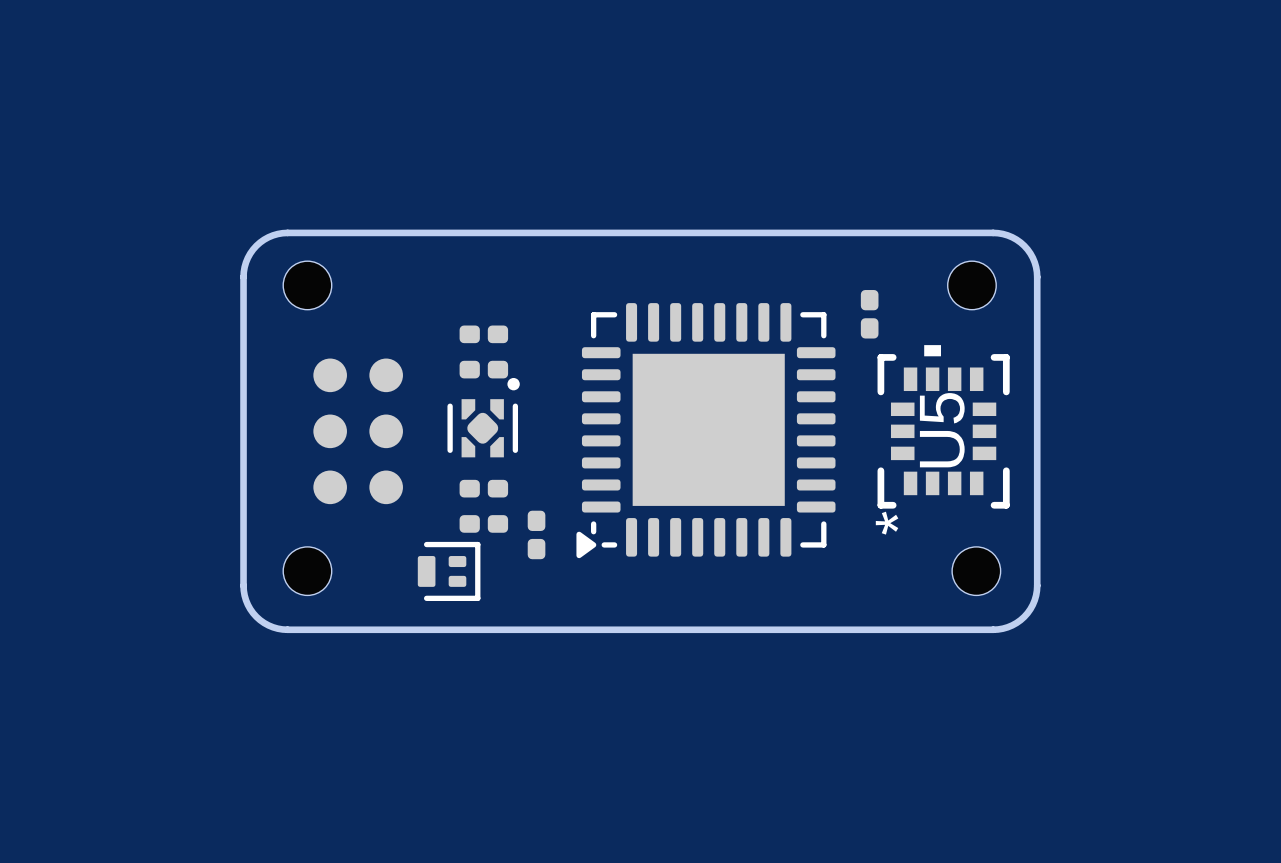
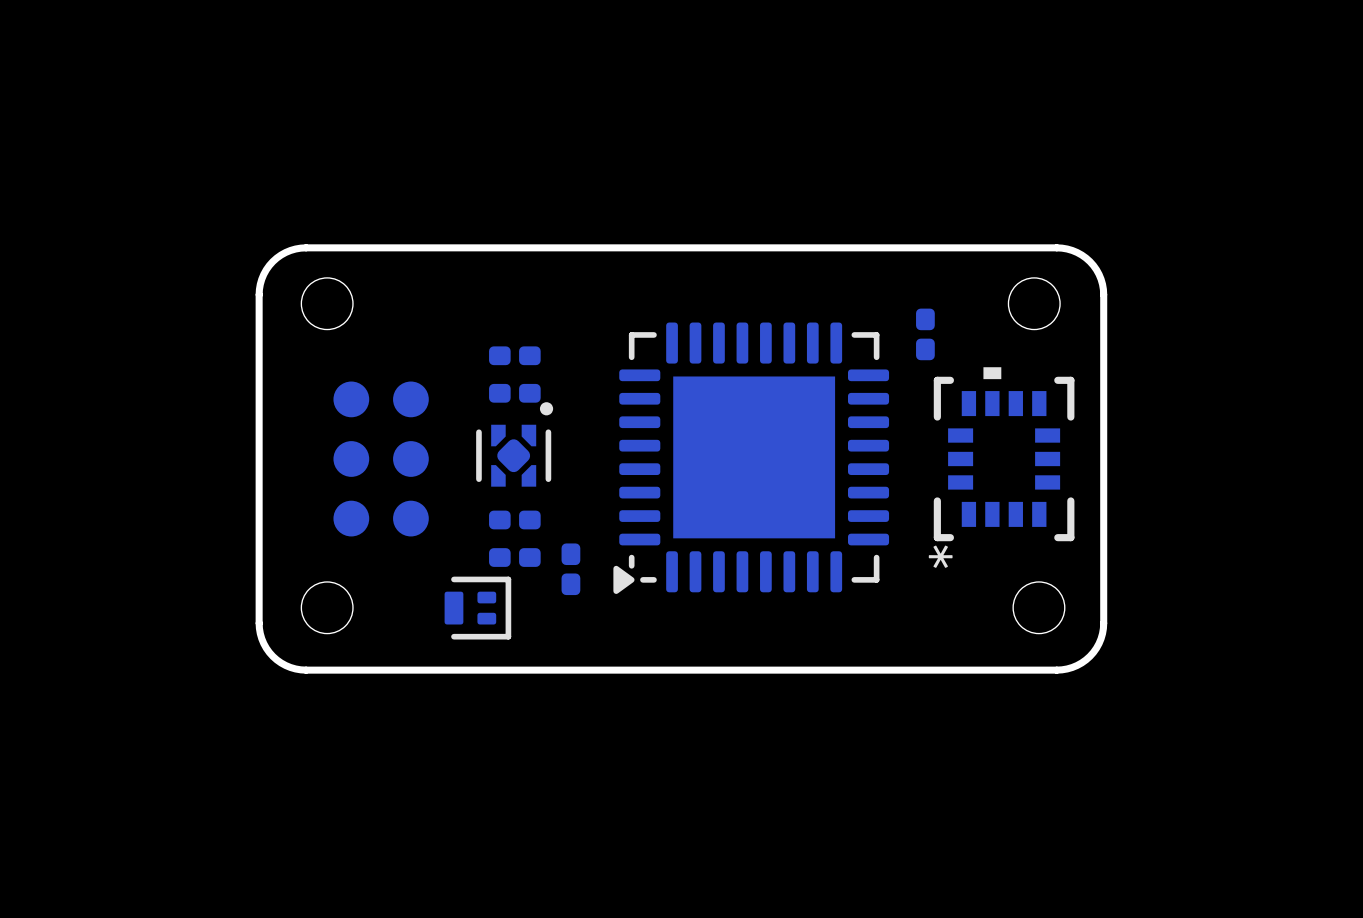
U5 name: U5 (942, 430) -> none

